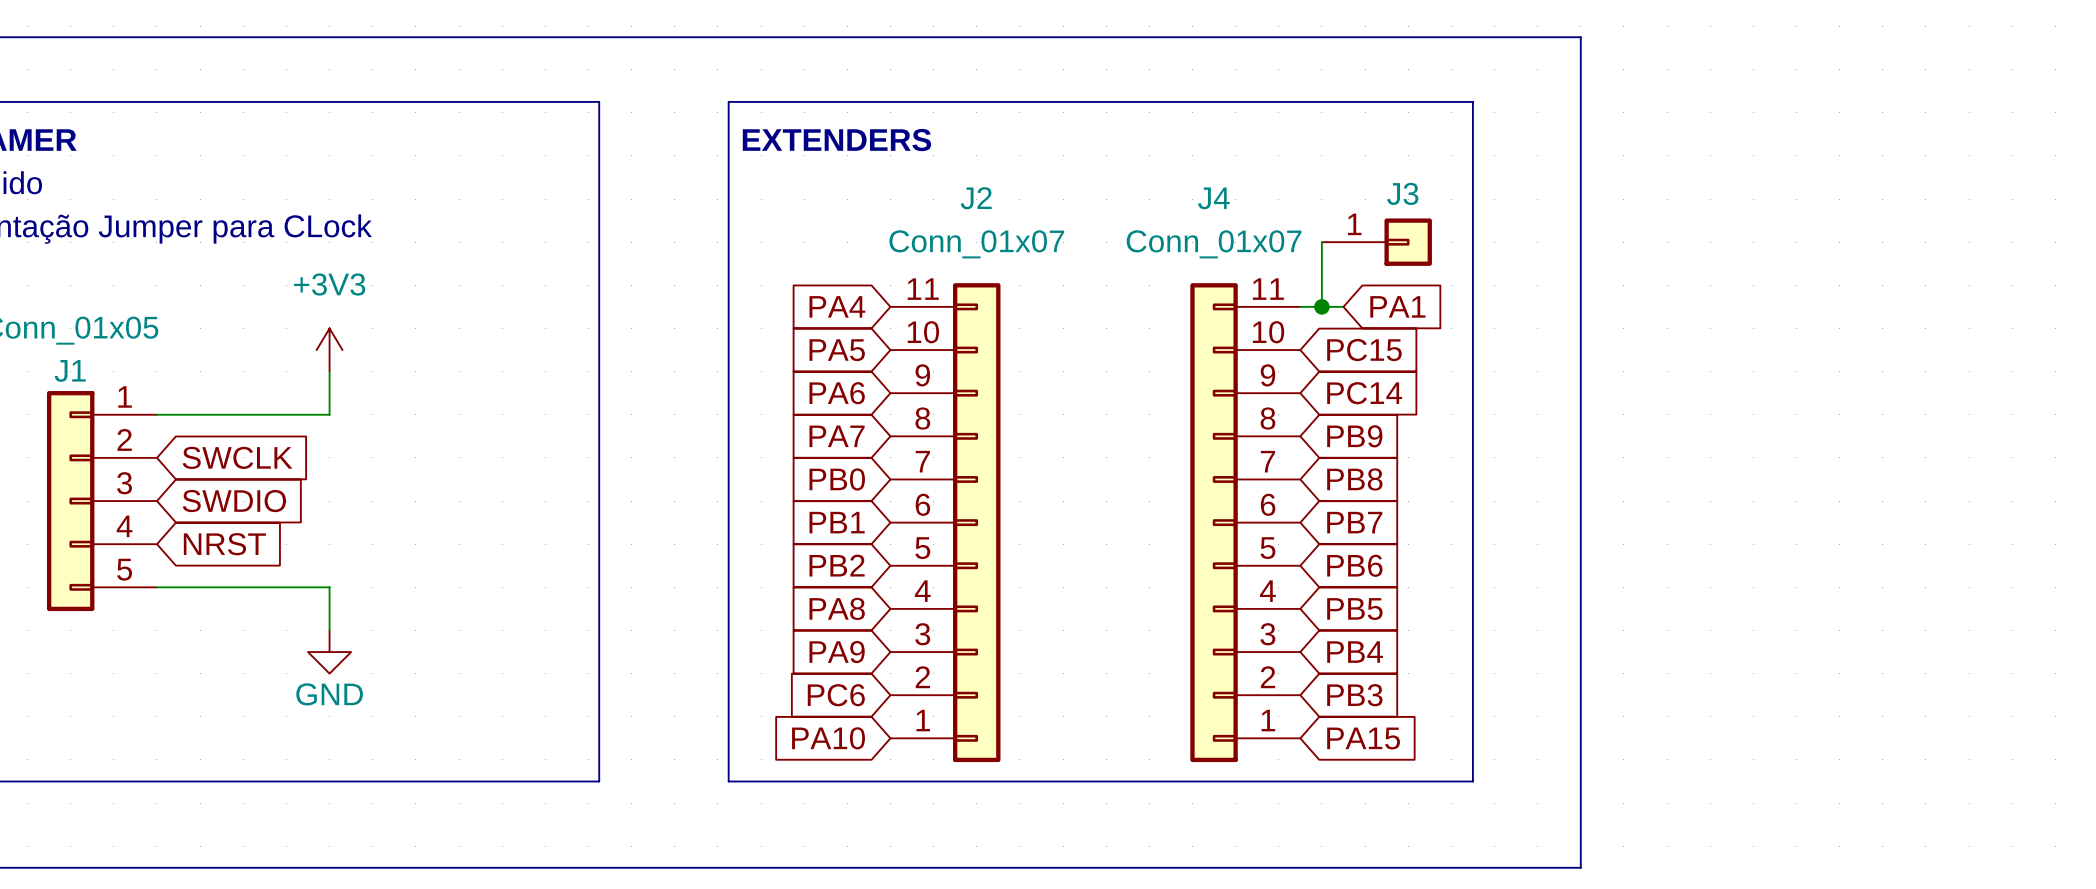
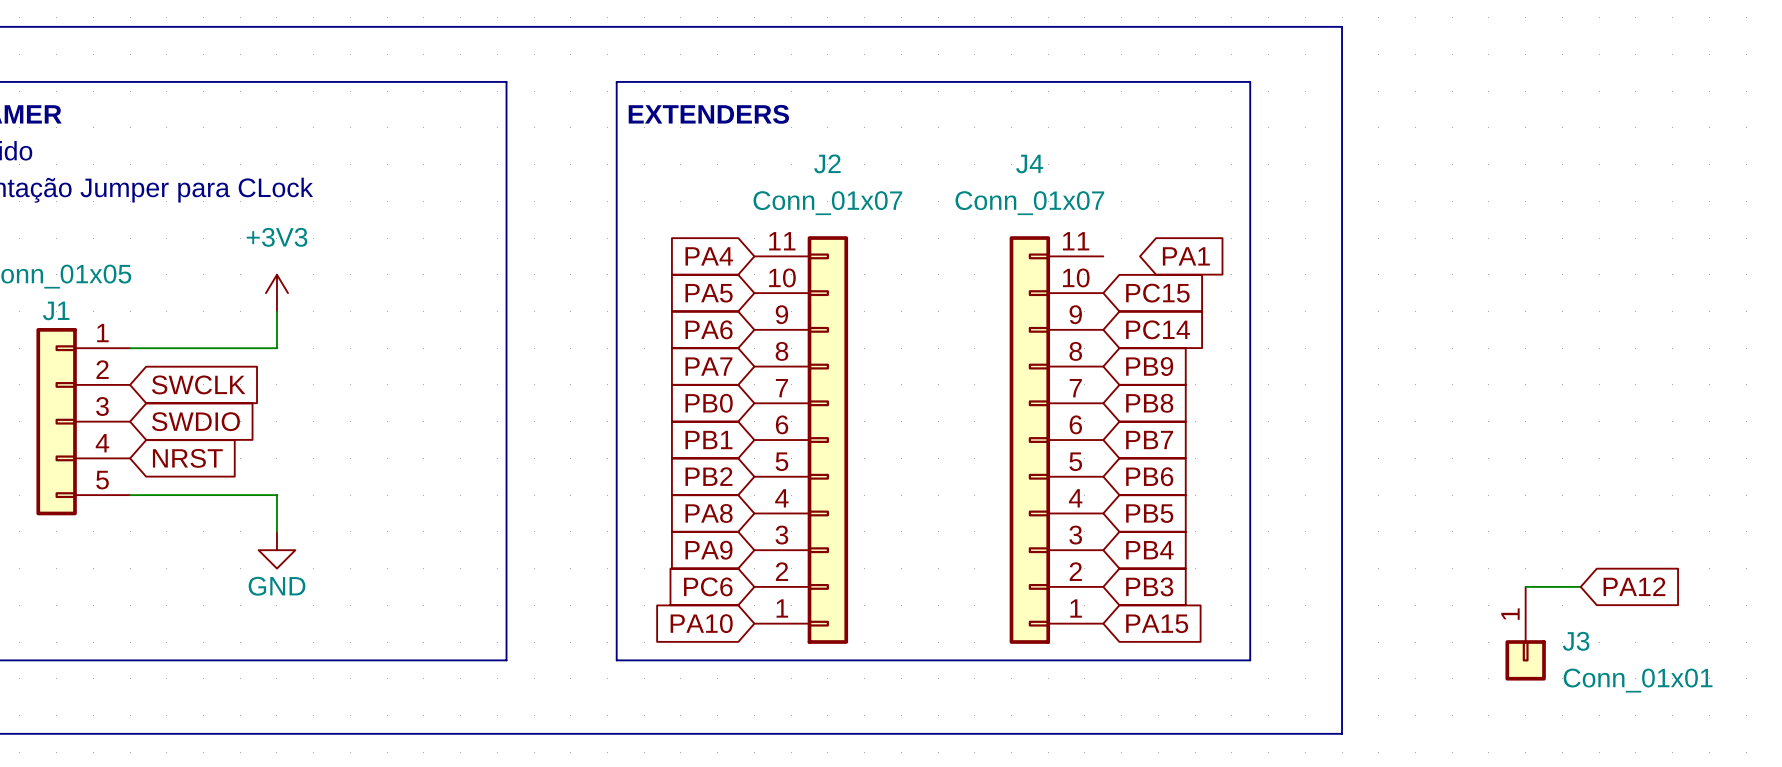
wire: (1321, 242) (1321, 306) -> none
J3 position: (1376, 242) -> (1525, 633)
J3 rotation: 0° (1408, 242) -> 90° clockwise (1525, 660)
wire: (1300, 306) (1343, 306) -> none
junction: (1321, 306) -> none
wire: none -> (1525, 586) (1580, 586)
global label: none -> PA12 (1634, 586)
J3 value: none -> Conn_01x01 (1638, 680)

